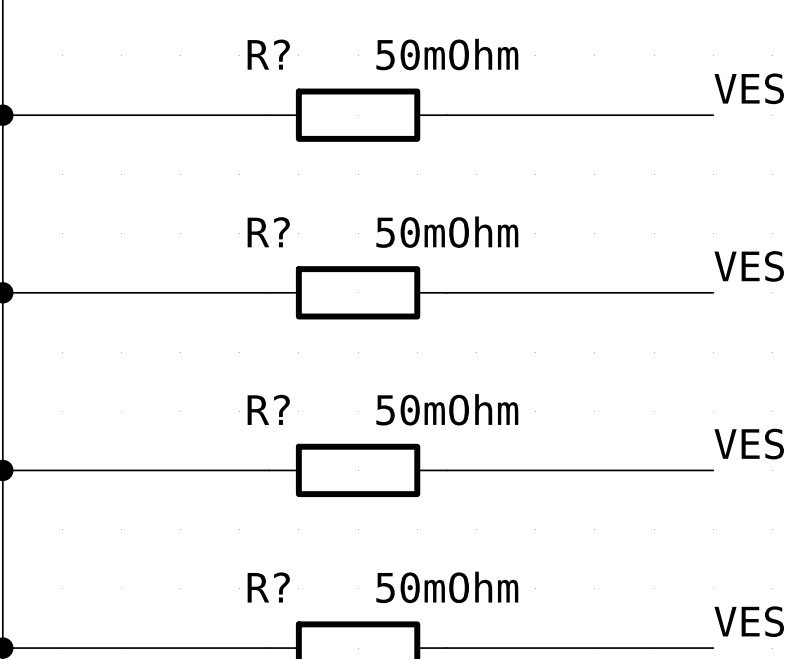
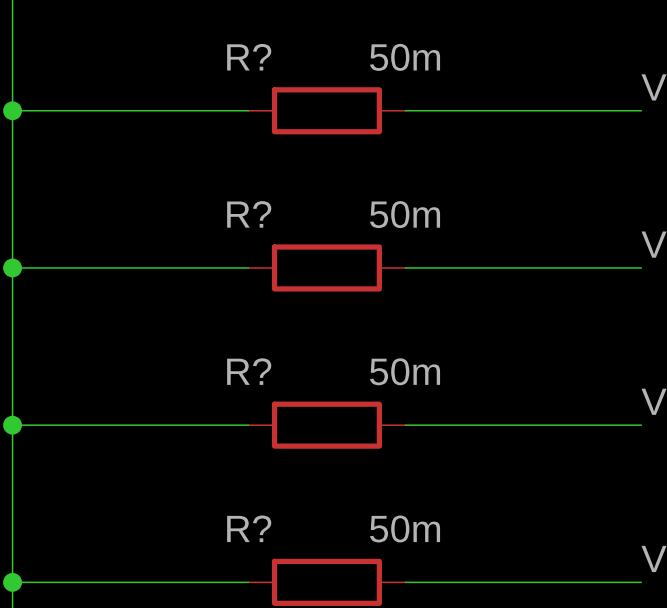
R? value: 50mOhm (447, 54) -> 50m (405, 57)
R? value: 50mOhm (447, 232) -> 50m (405, 214)
R? value: 50mOhm (447, 409) -> 50m (405, 371)
R? value: 50mOhm (447, 587) -> 50m (405, 528)

